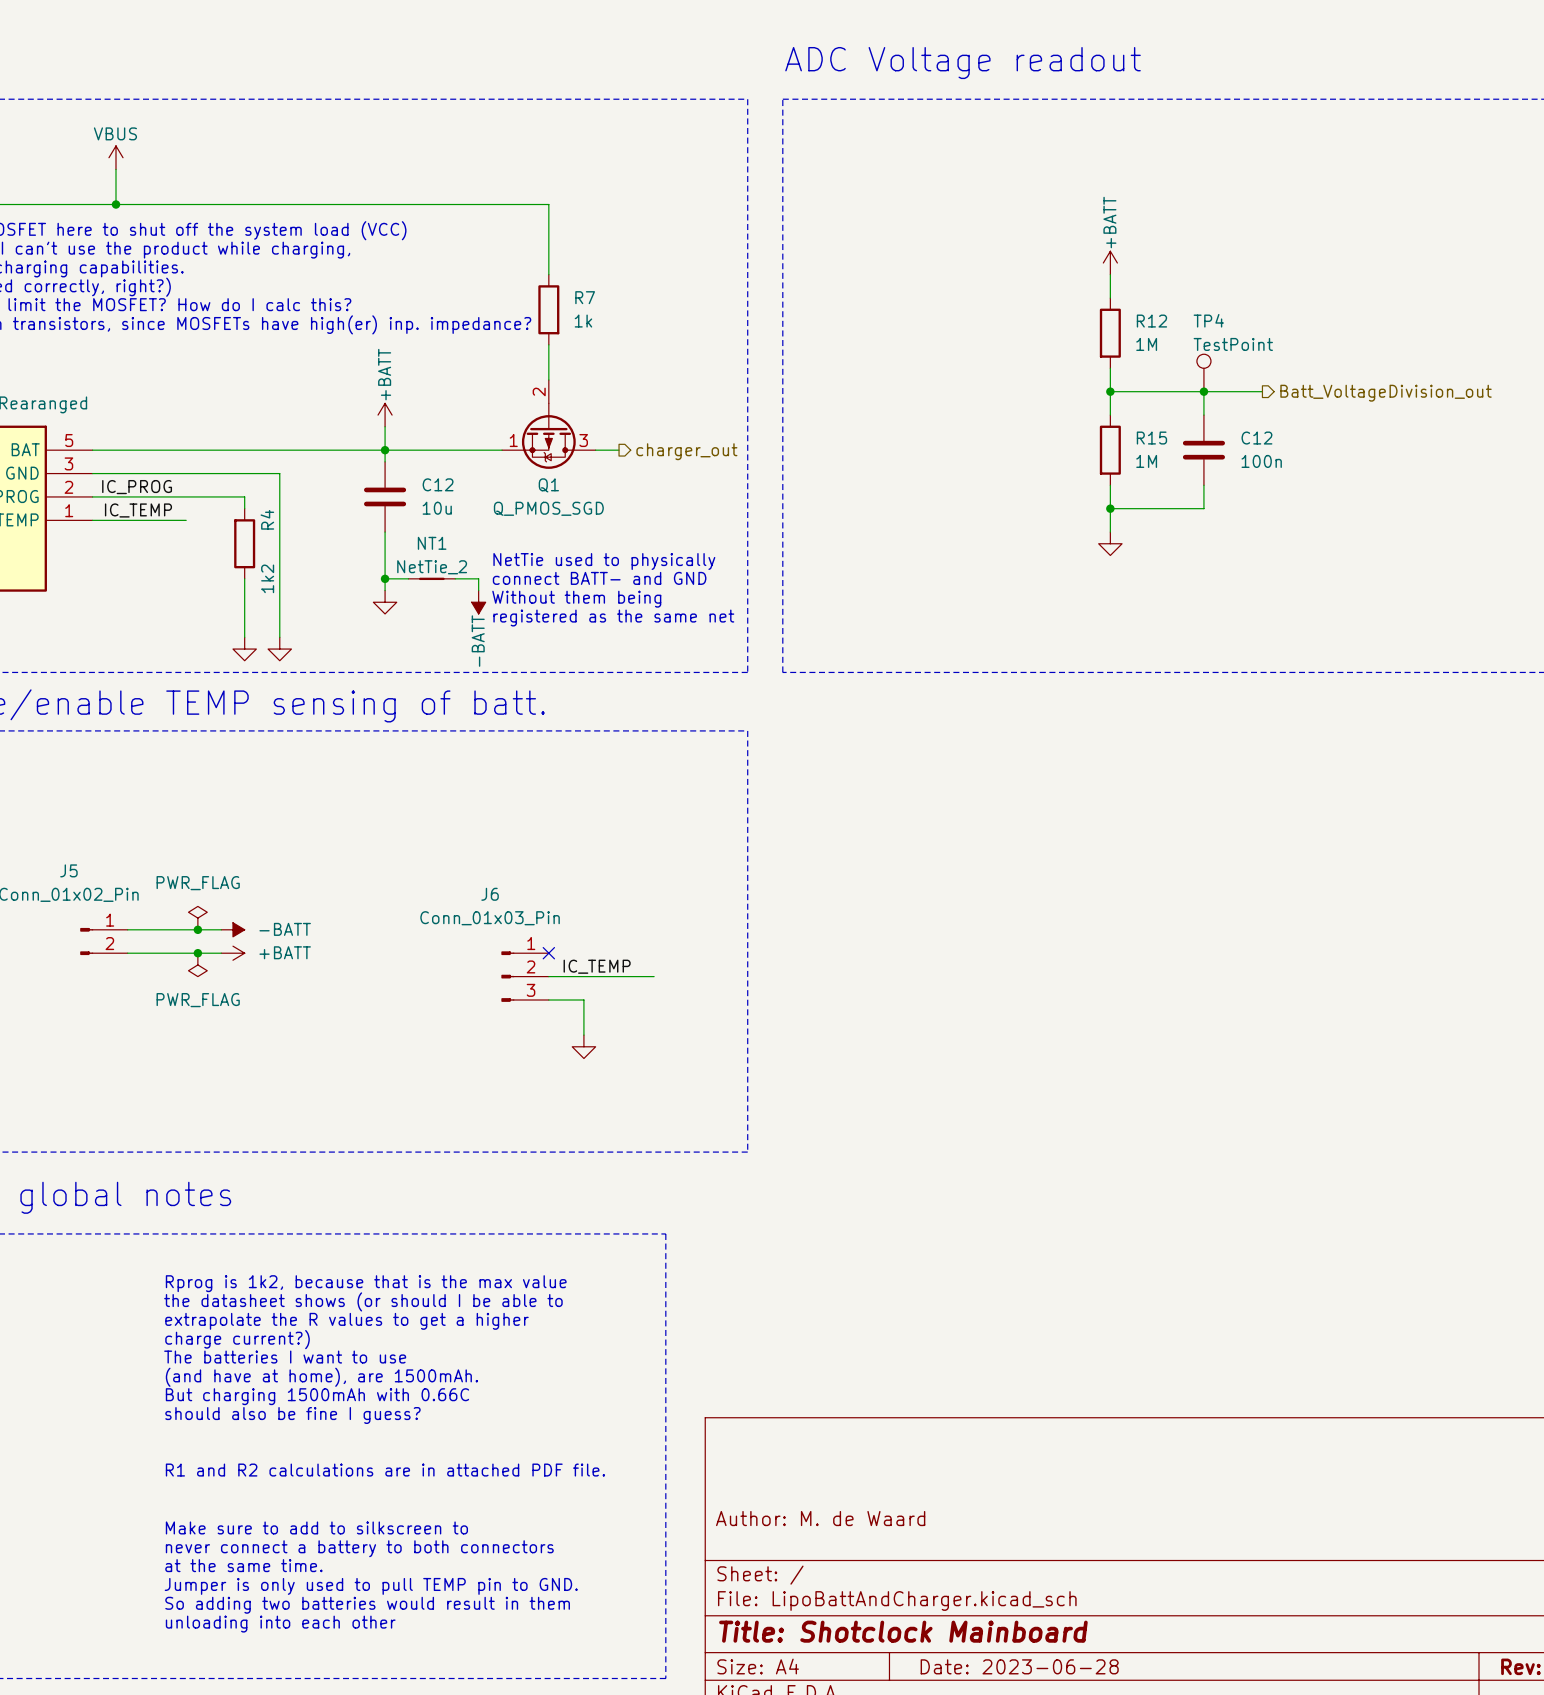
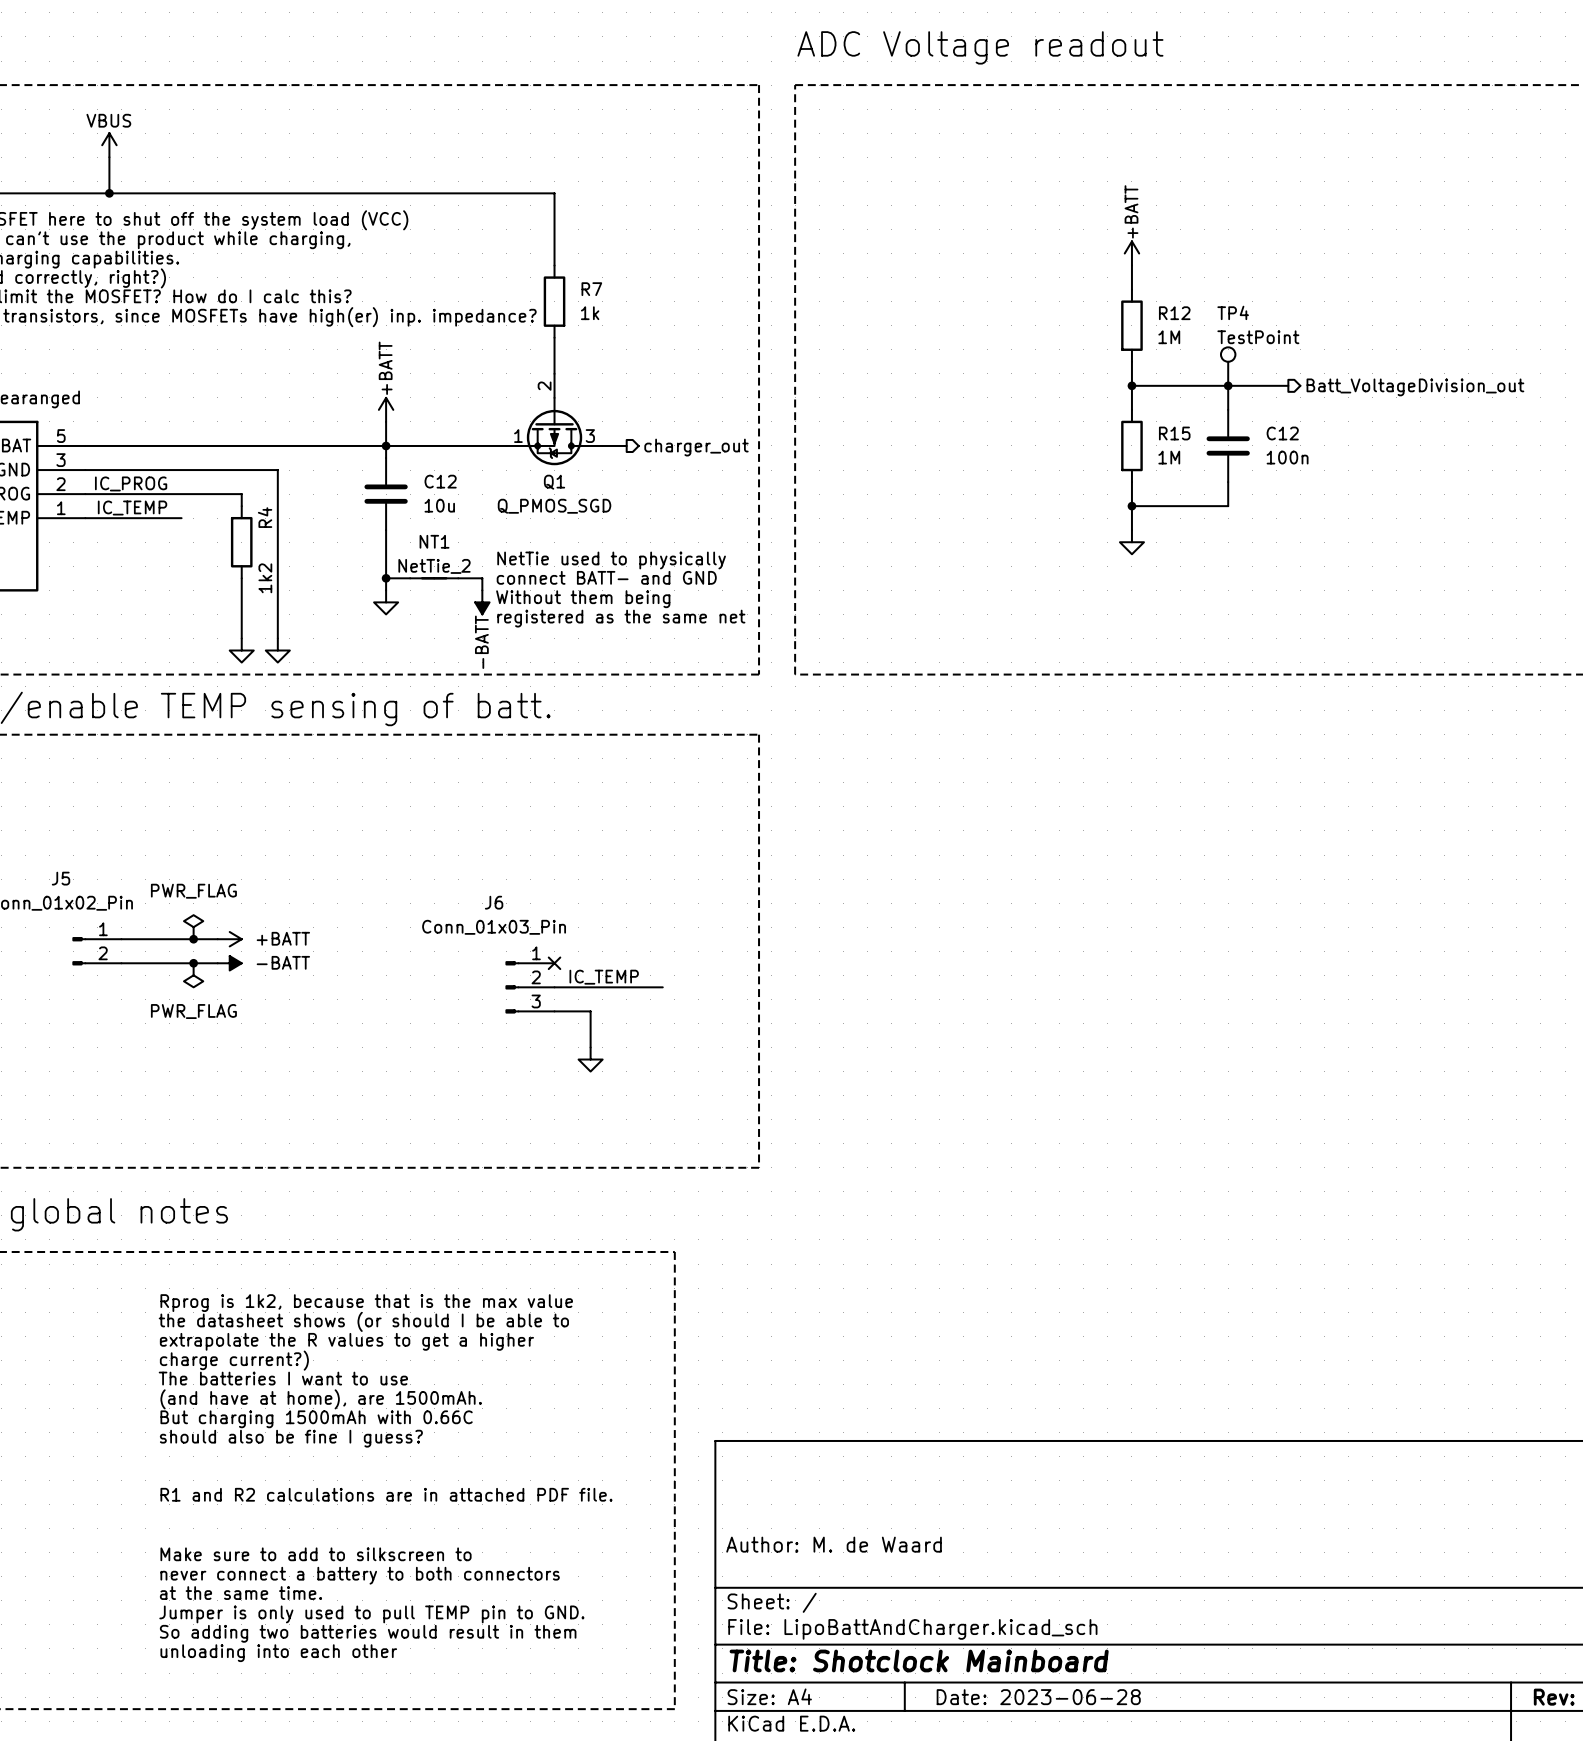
power symbol: -BATT (232, 929) -> +BATT (229, 939)
power symbol: +BATT (232, 953) -> -BATT (229, 963)

